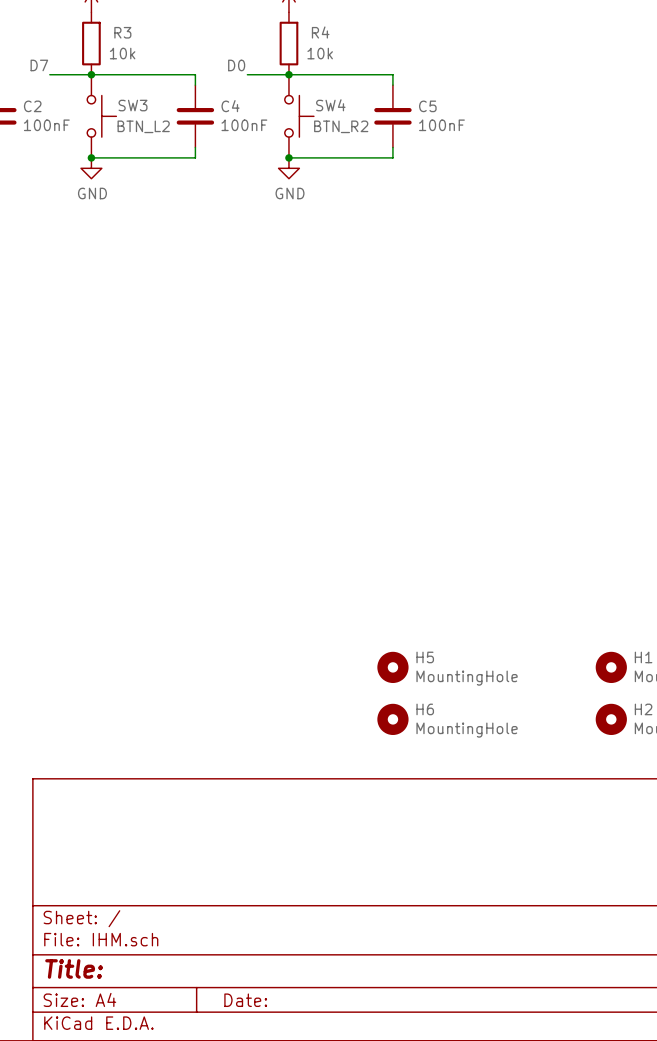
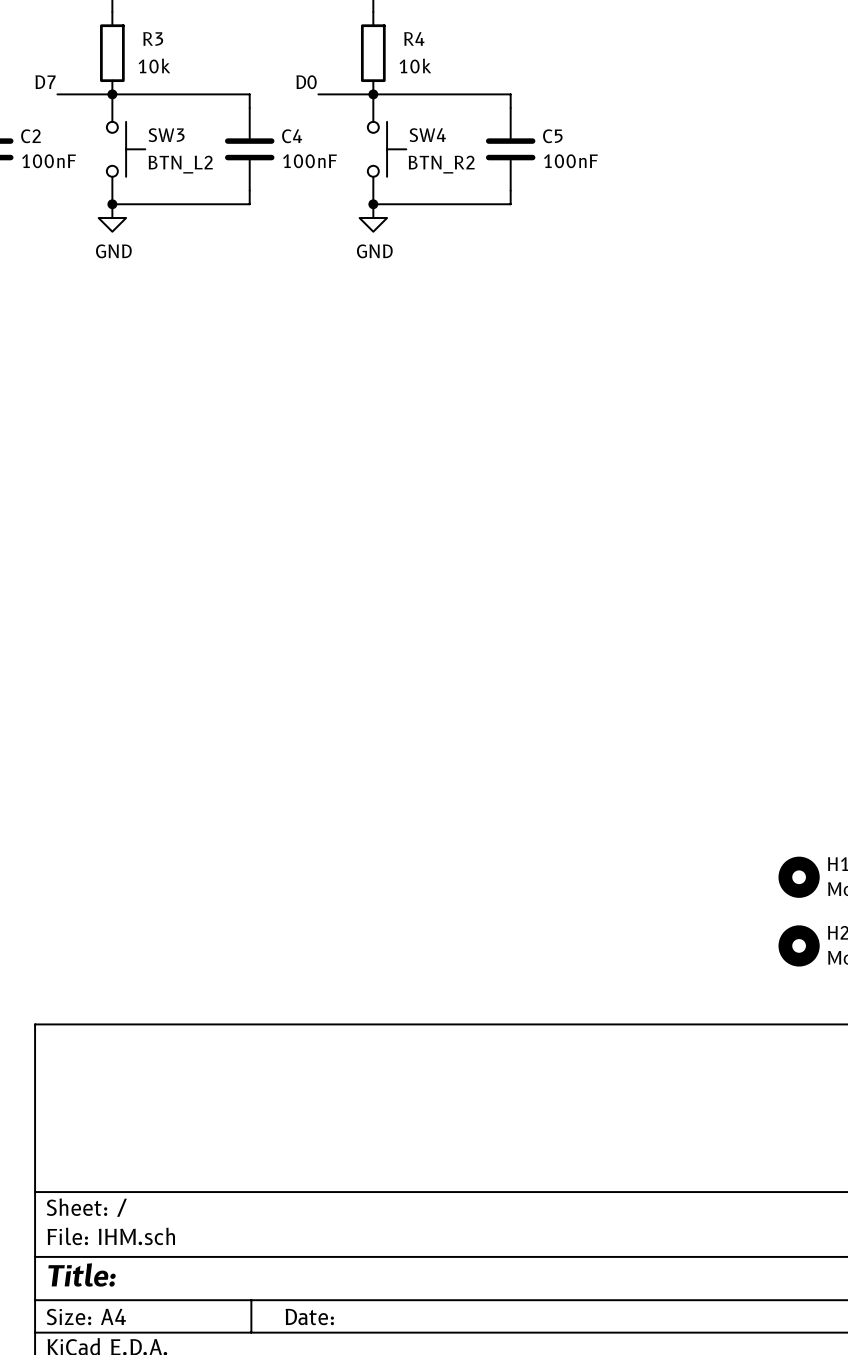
H5: MountingHole (392, 667) -> none
H6: MountingHole (392, 719) -> none

